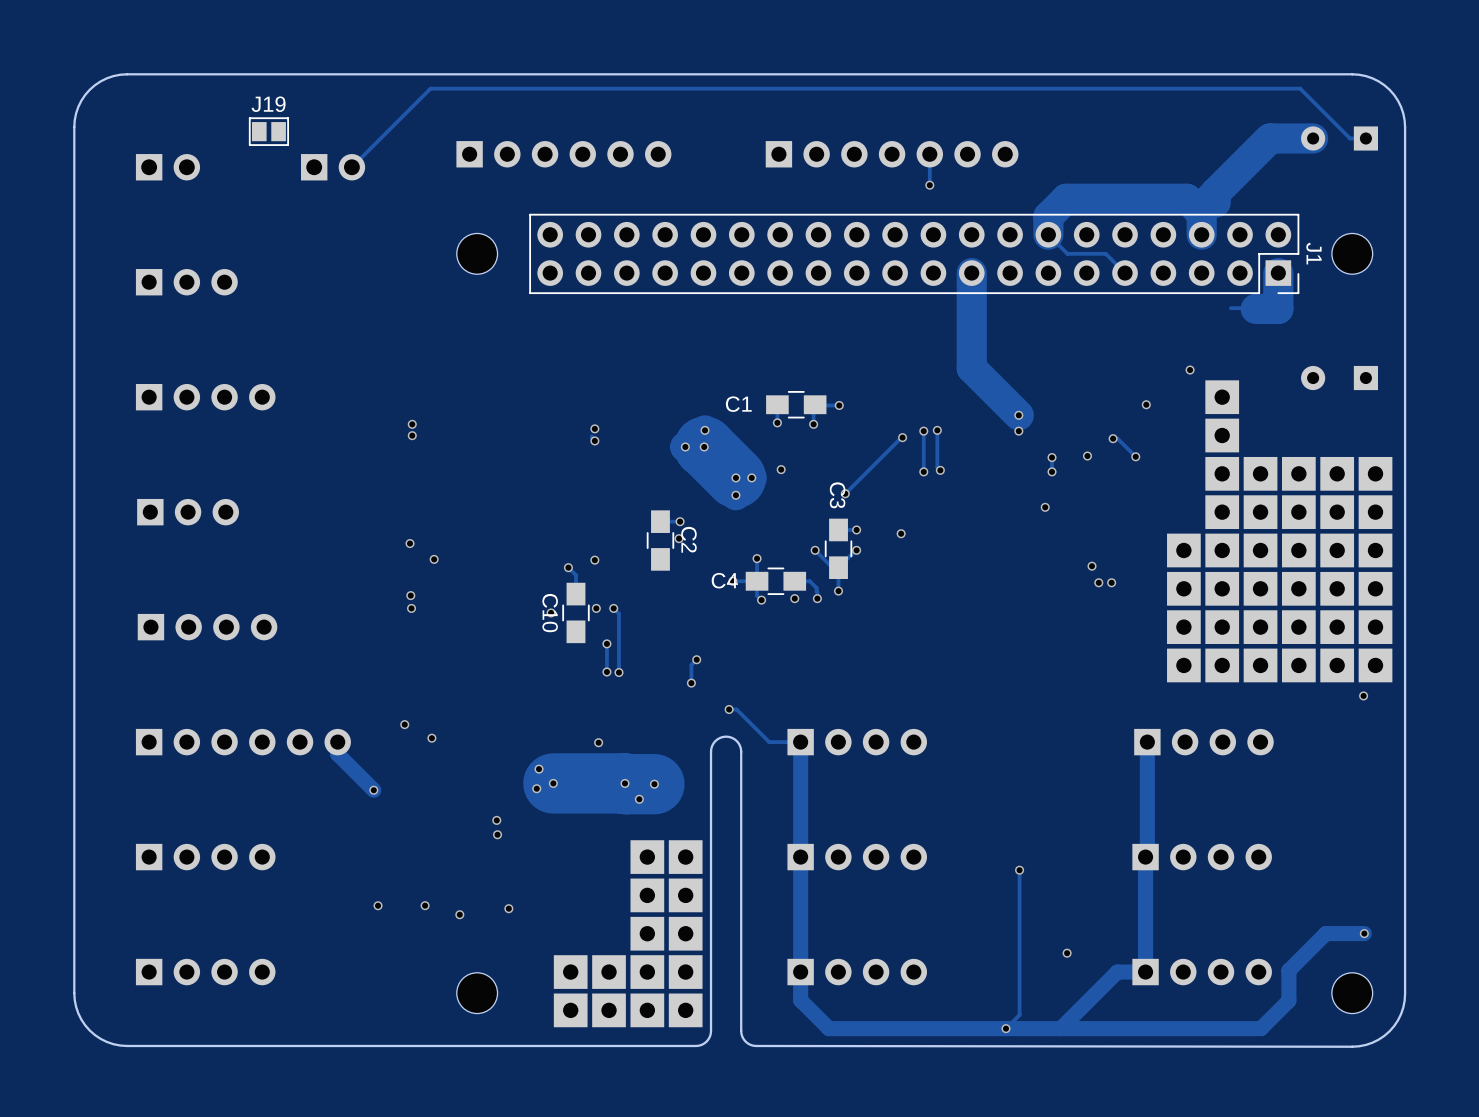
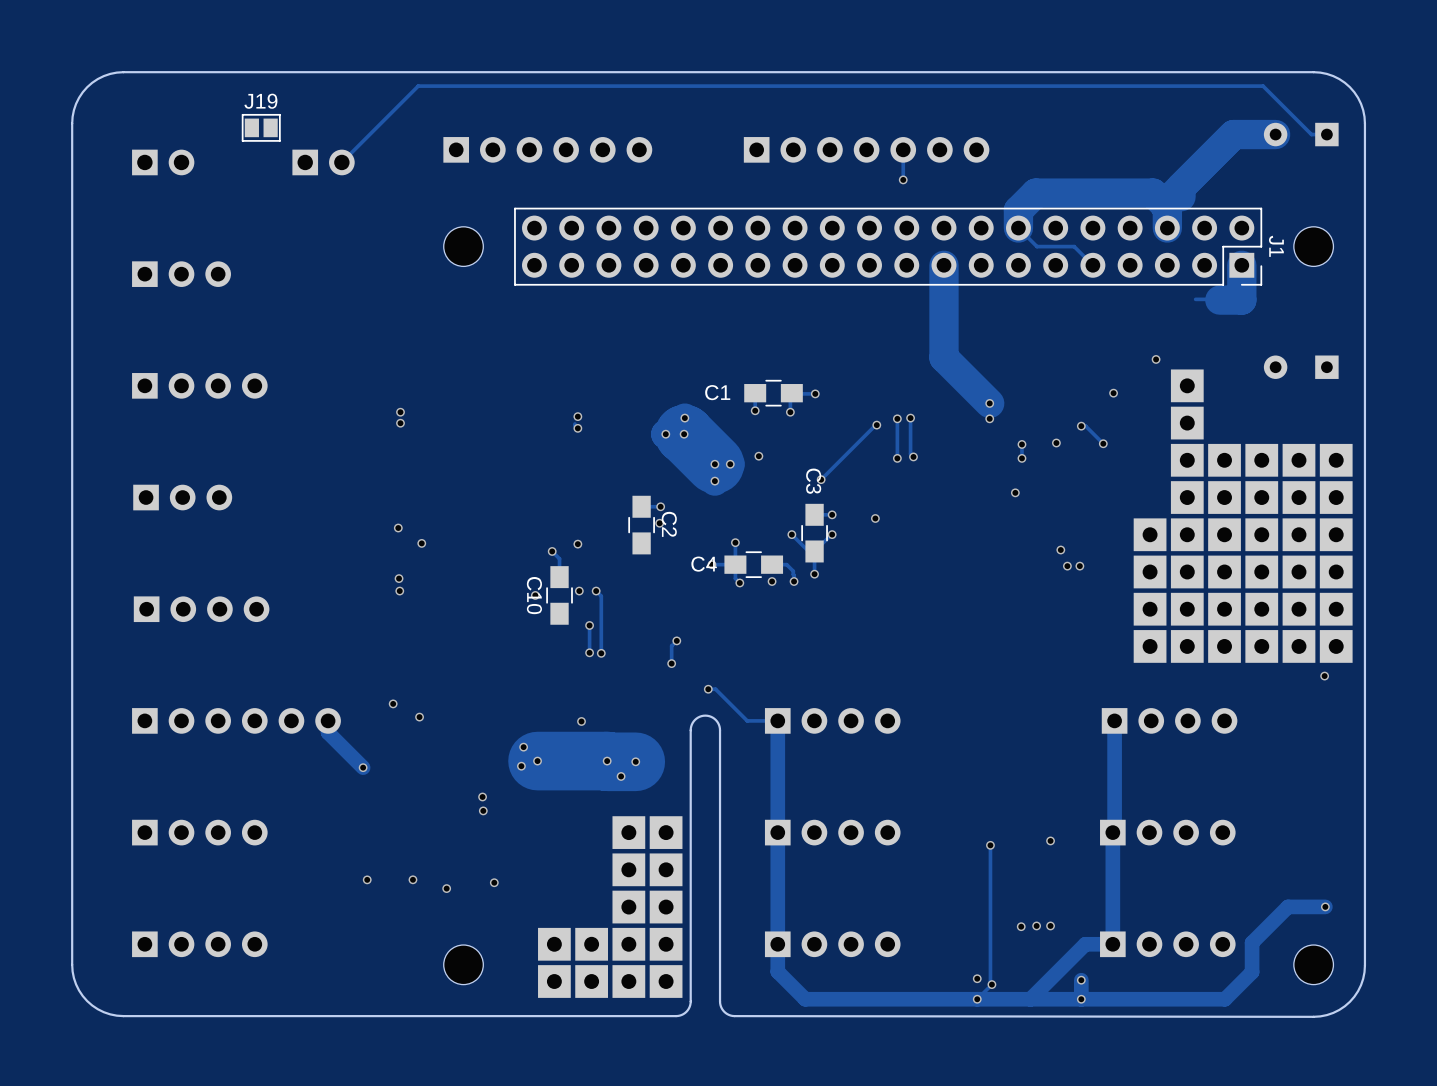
via: none -> (1050, 840)
via: none -> (1021, 926)
via: none -> (1050, 925)
via: none -> (977, 978)
track: none -> (1081, 980) (1081, 999)
via: none -> (1081, 980)
via: none -> (991, 984)
via: none -> (1081, 999)

